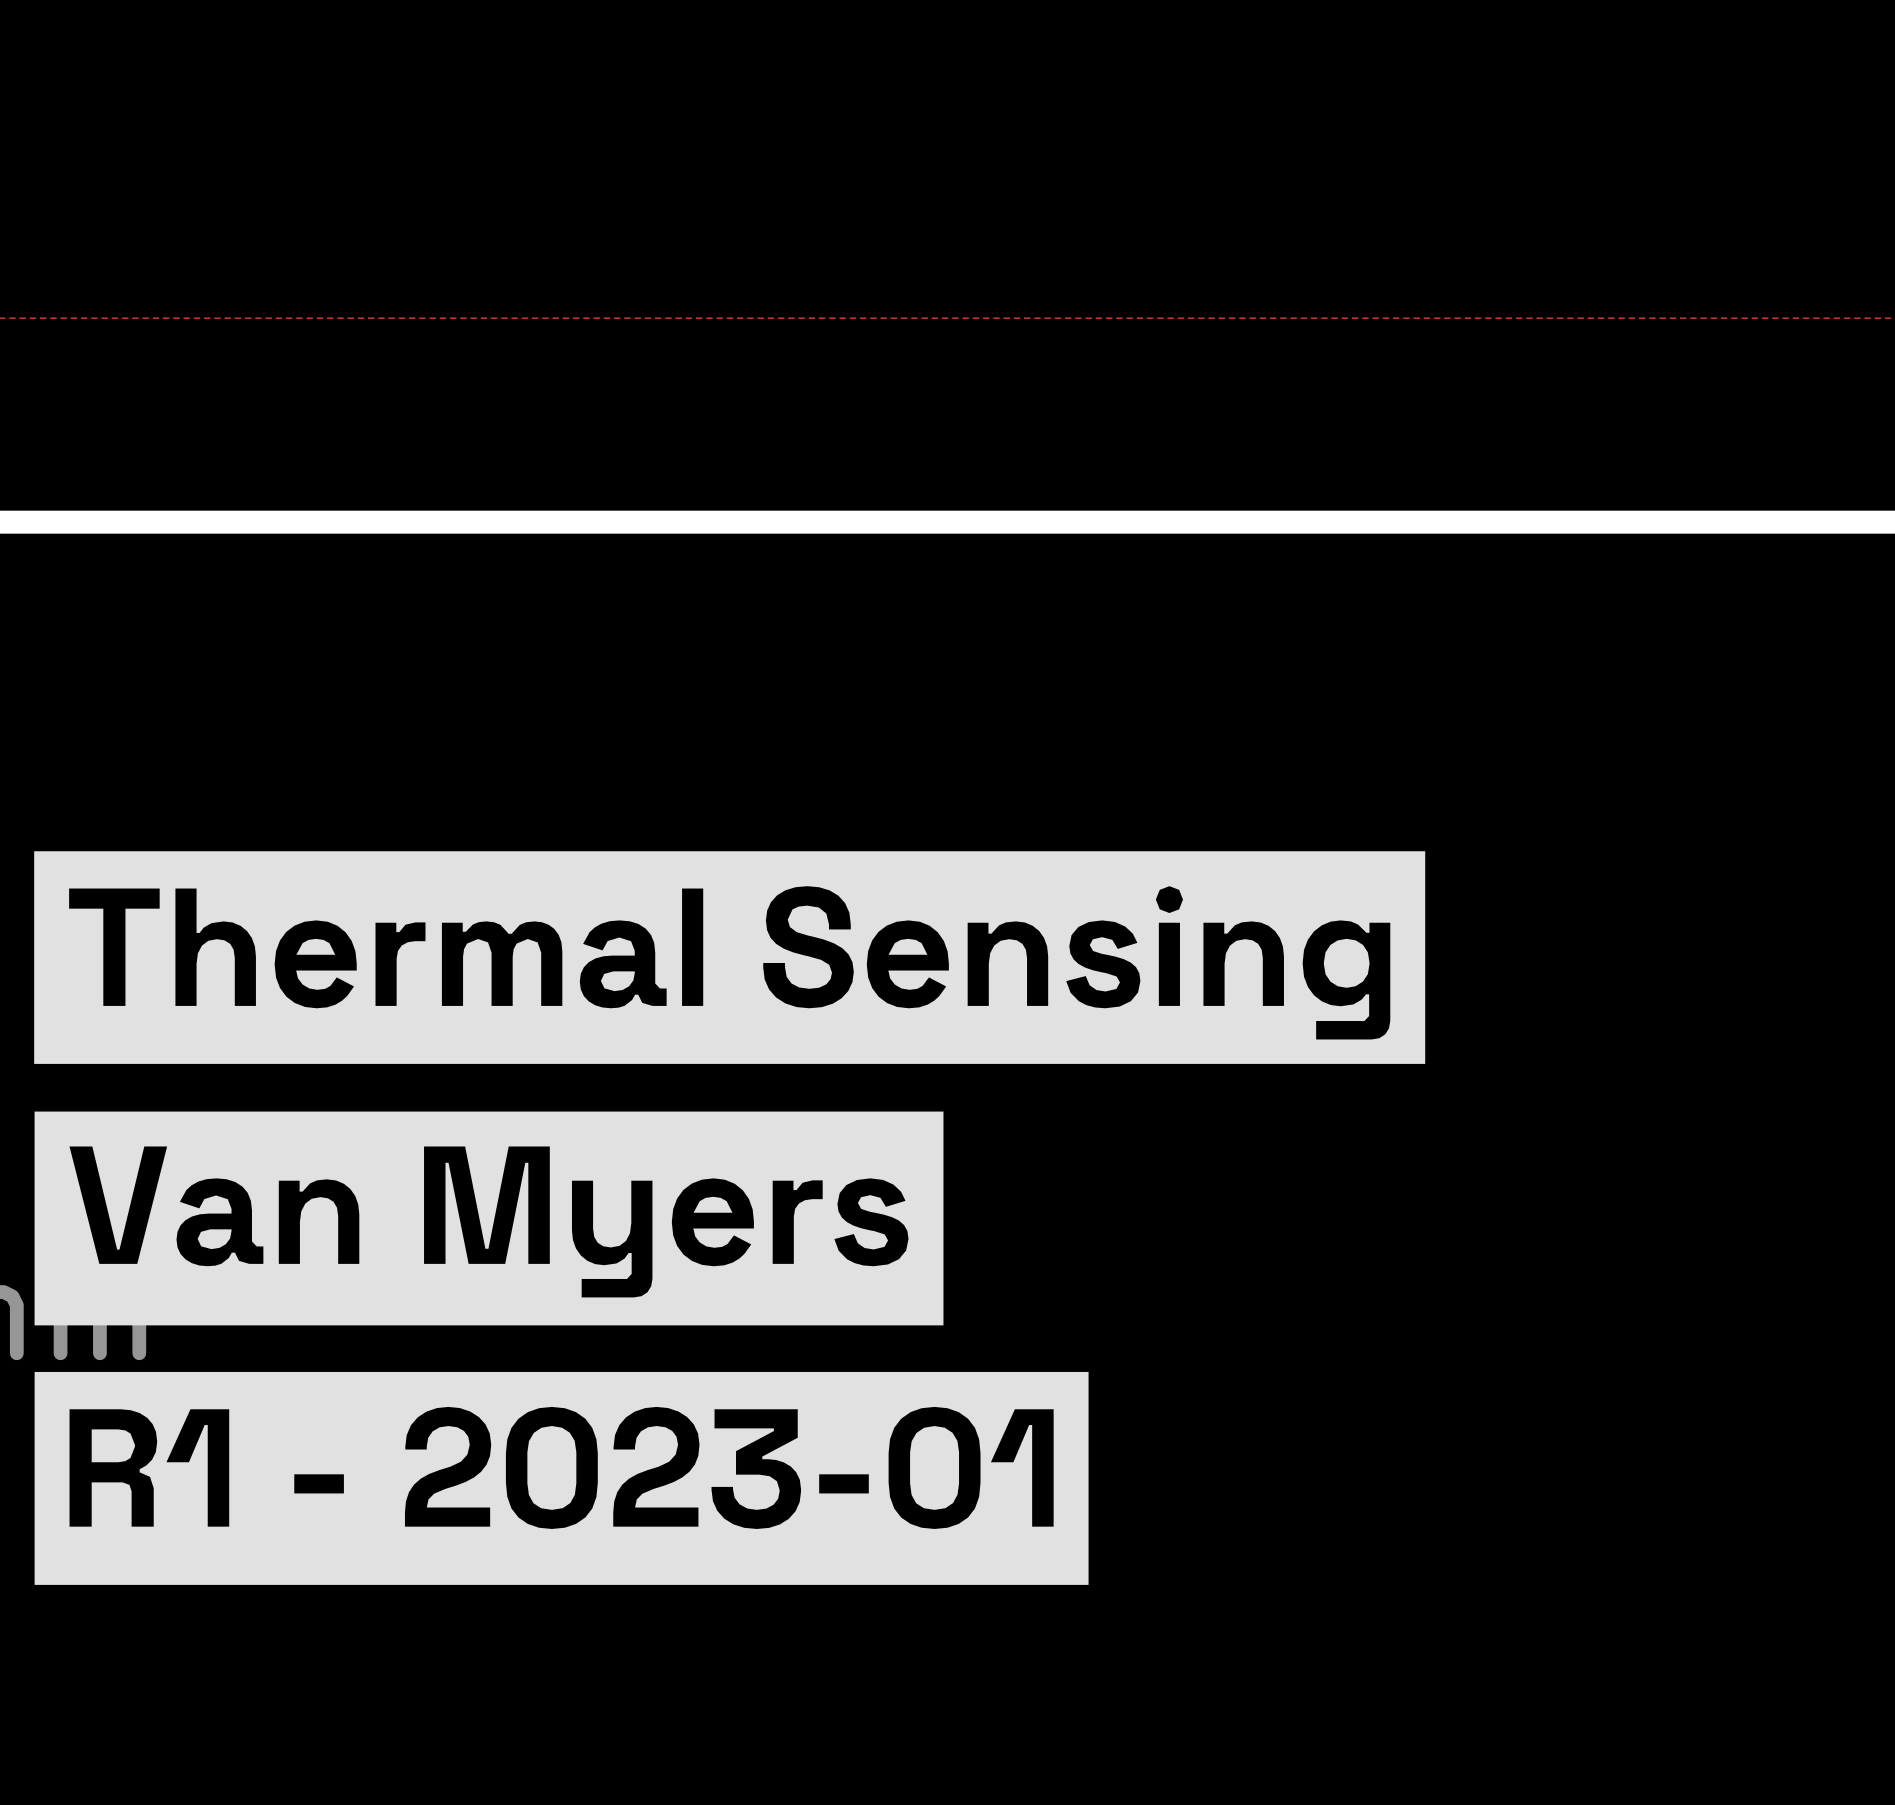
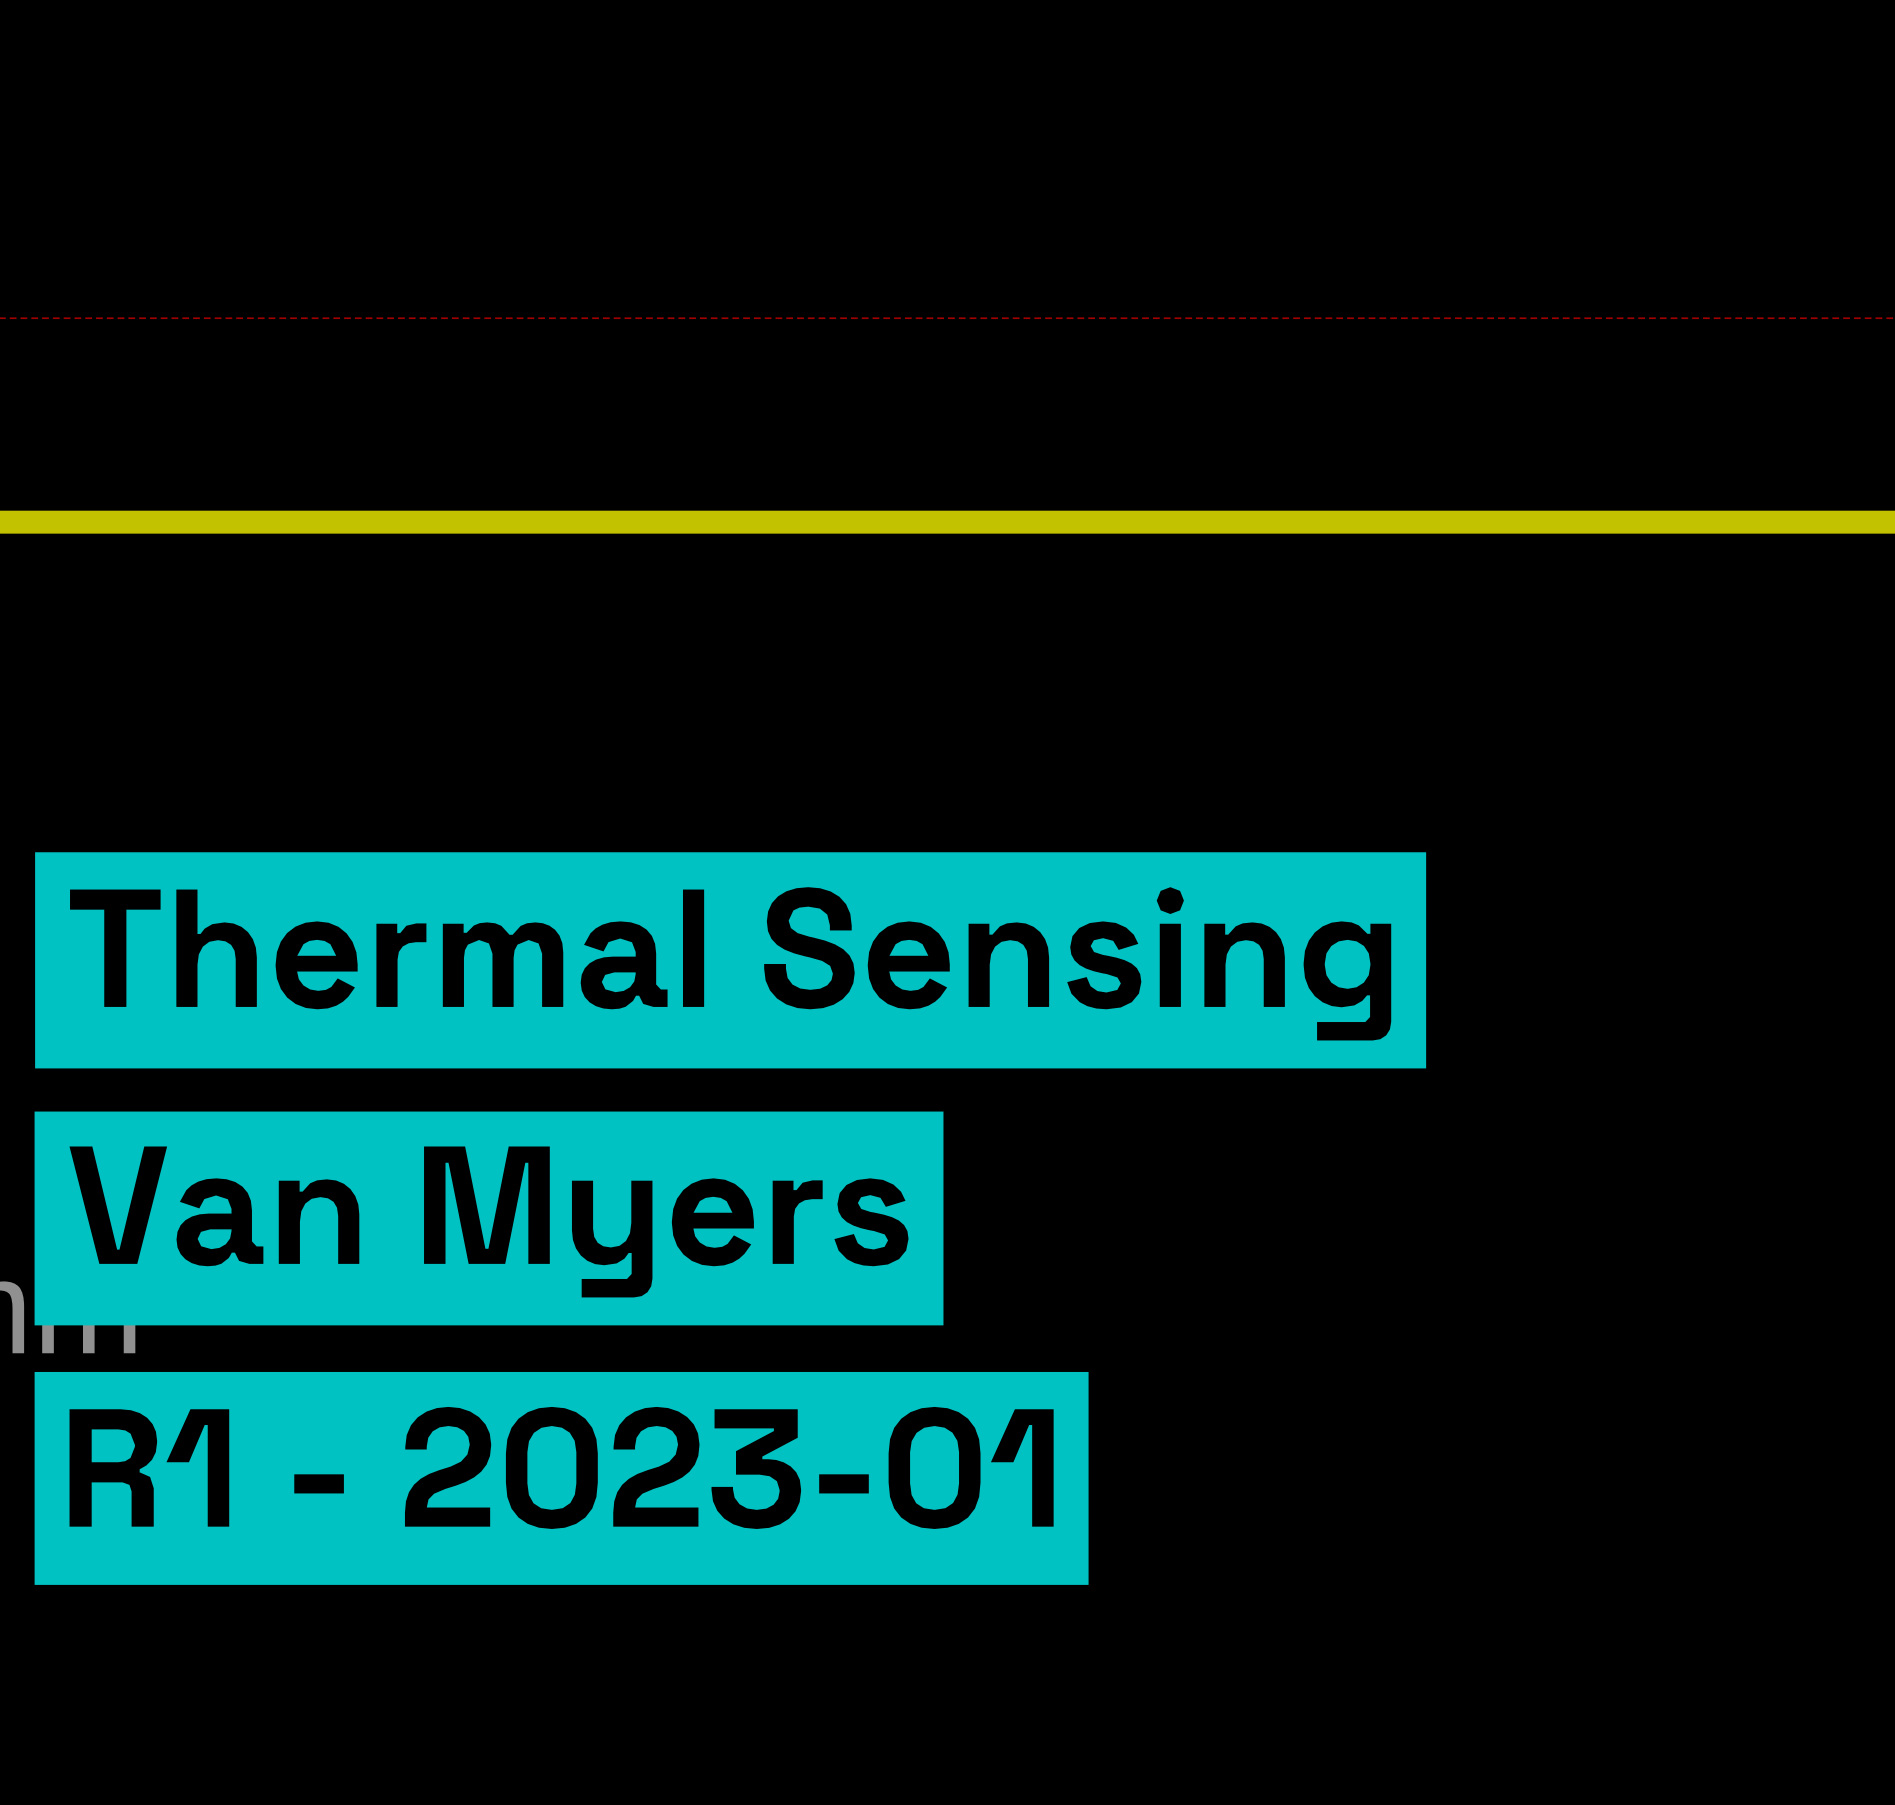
drawing shape: [34, 851, 1426, 1064] -> [35, 852, 1427, 1069]

